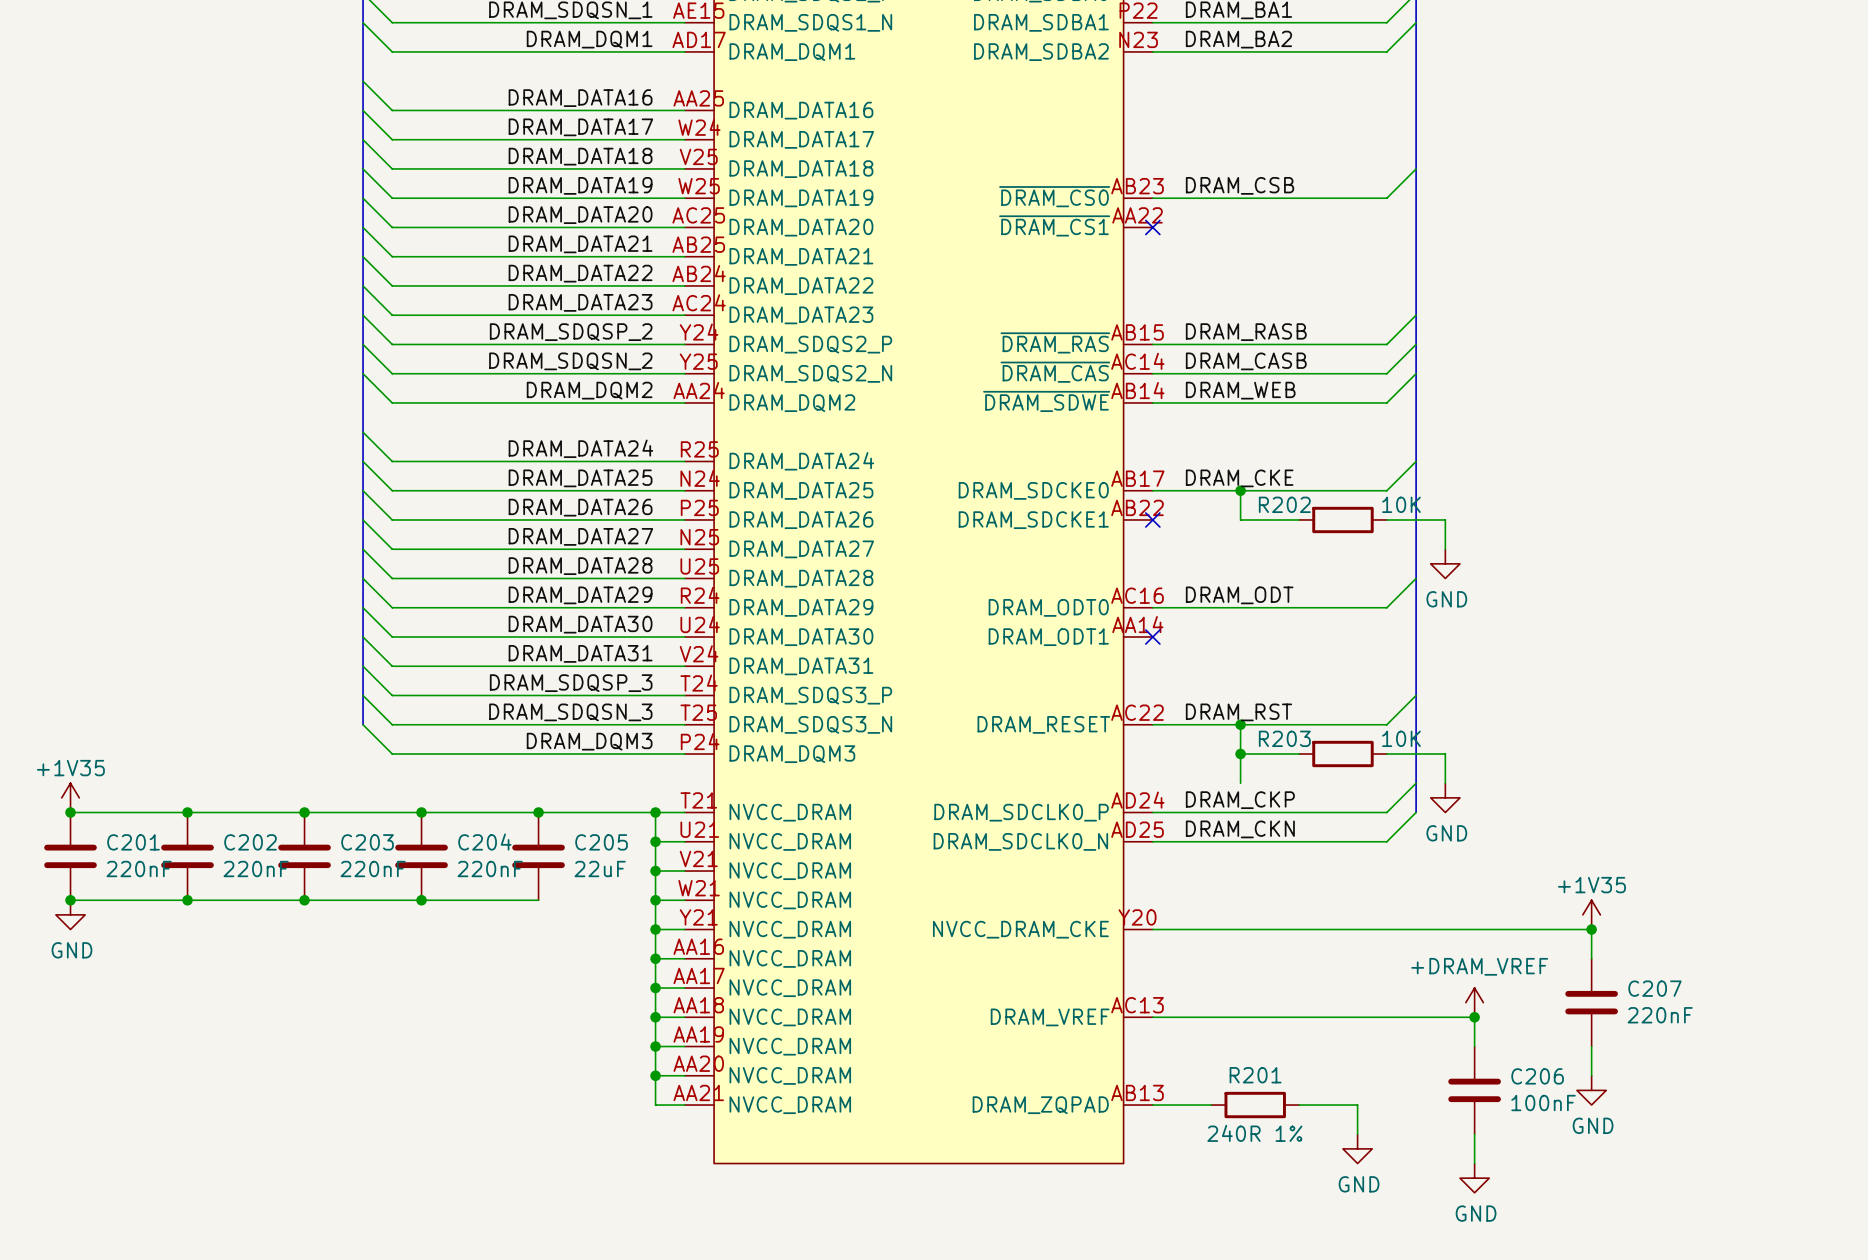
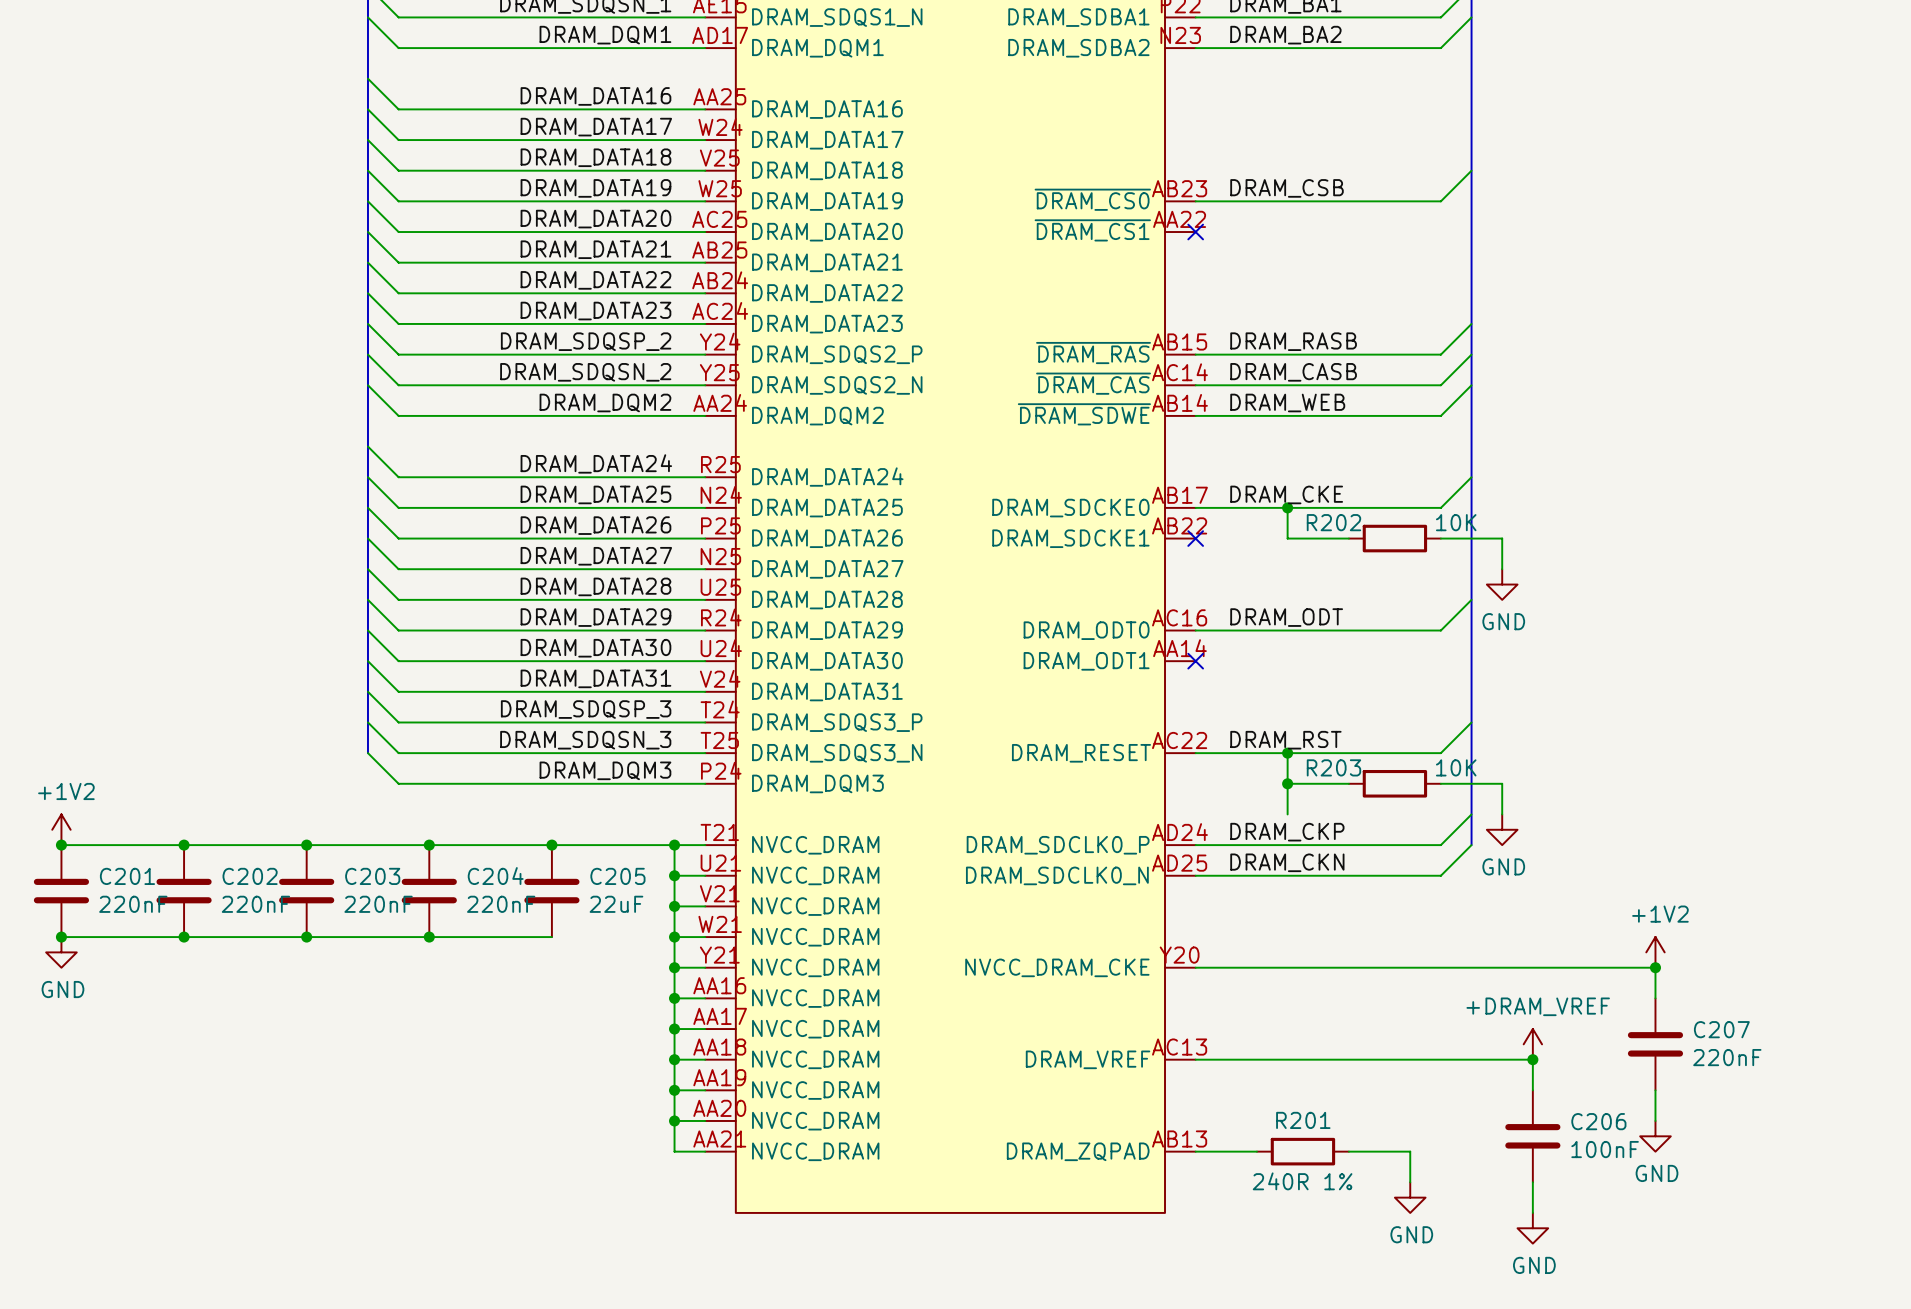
power symbol: +1V35 (70, 797) -> +1V2 (61, 829)
power symbol: +1V35 (1591, 914) -> +1V2 (1655, 952)

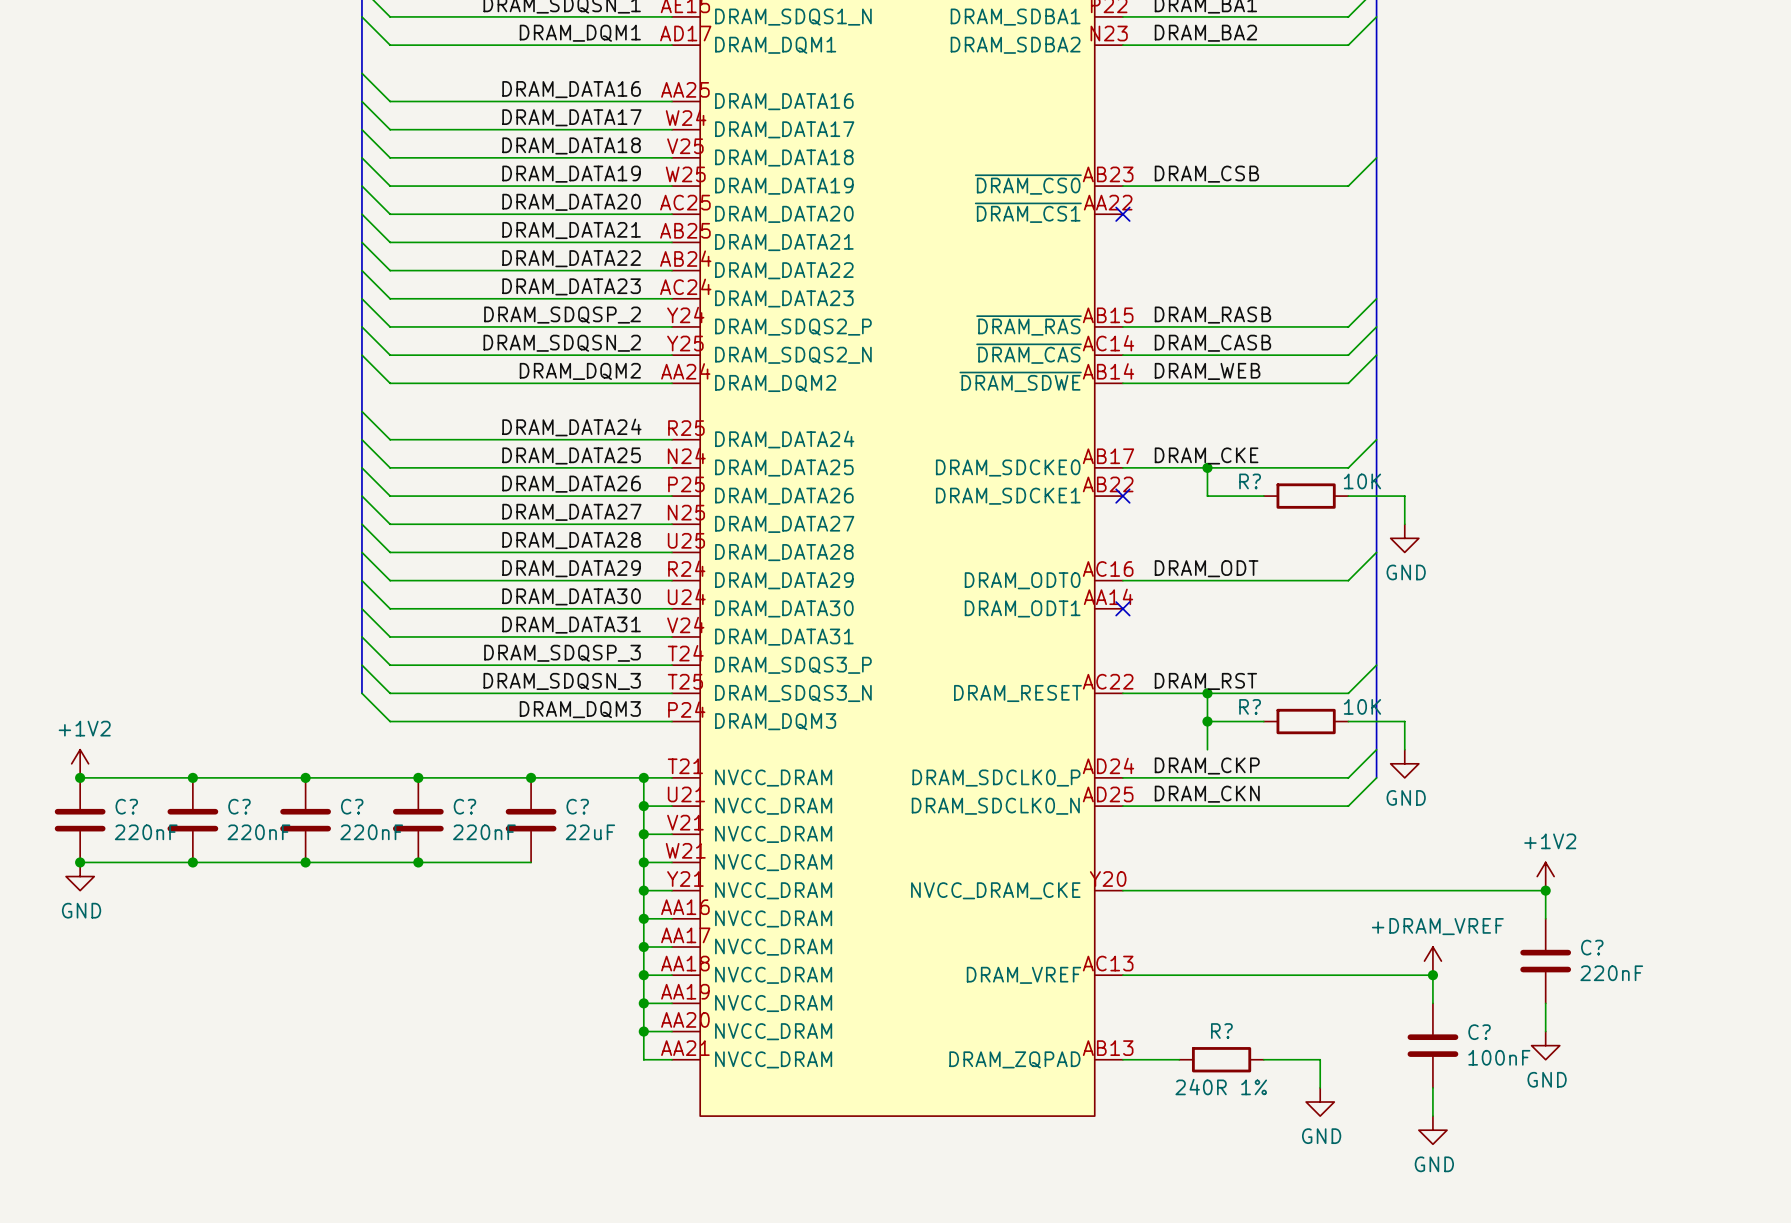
R202 name: R202 (1333, 522) -> R? (1250, 481)
R203 name: R203 (1333, 767) -> R? (1250, 706)
C201 name: C201 (127, 876) -> C? (126, 806)
C202 name: C202 (250, 876) -> C? (239, 806)
C203 name: C203 (372, 876) -> C? (352, 806)
C204 name: C204 (495, 876) -> C? (464, 806)
C205 name: C205 (617, 876) -> C? (577, 806)
C207 name: C207 (1721, 1029) -> C? (1592, 947)
R201 name: R201 (1303, 1120) -> R? (1221, 1031)
C206 name: C206 (1598, 1121) -> C? (1479, 1032)

